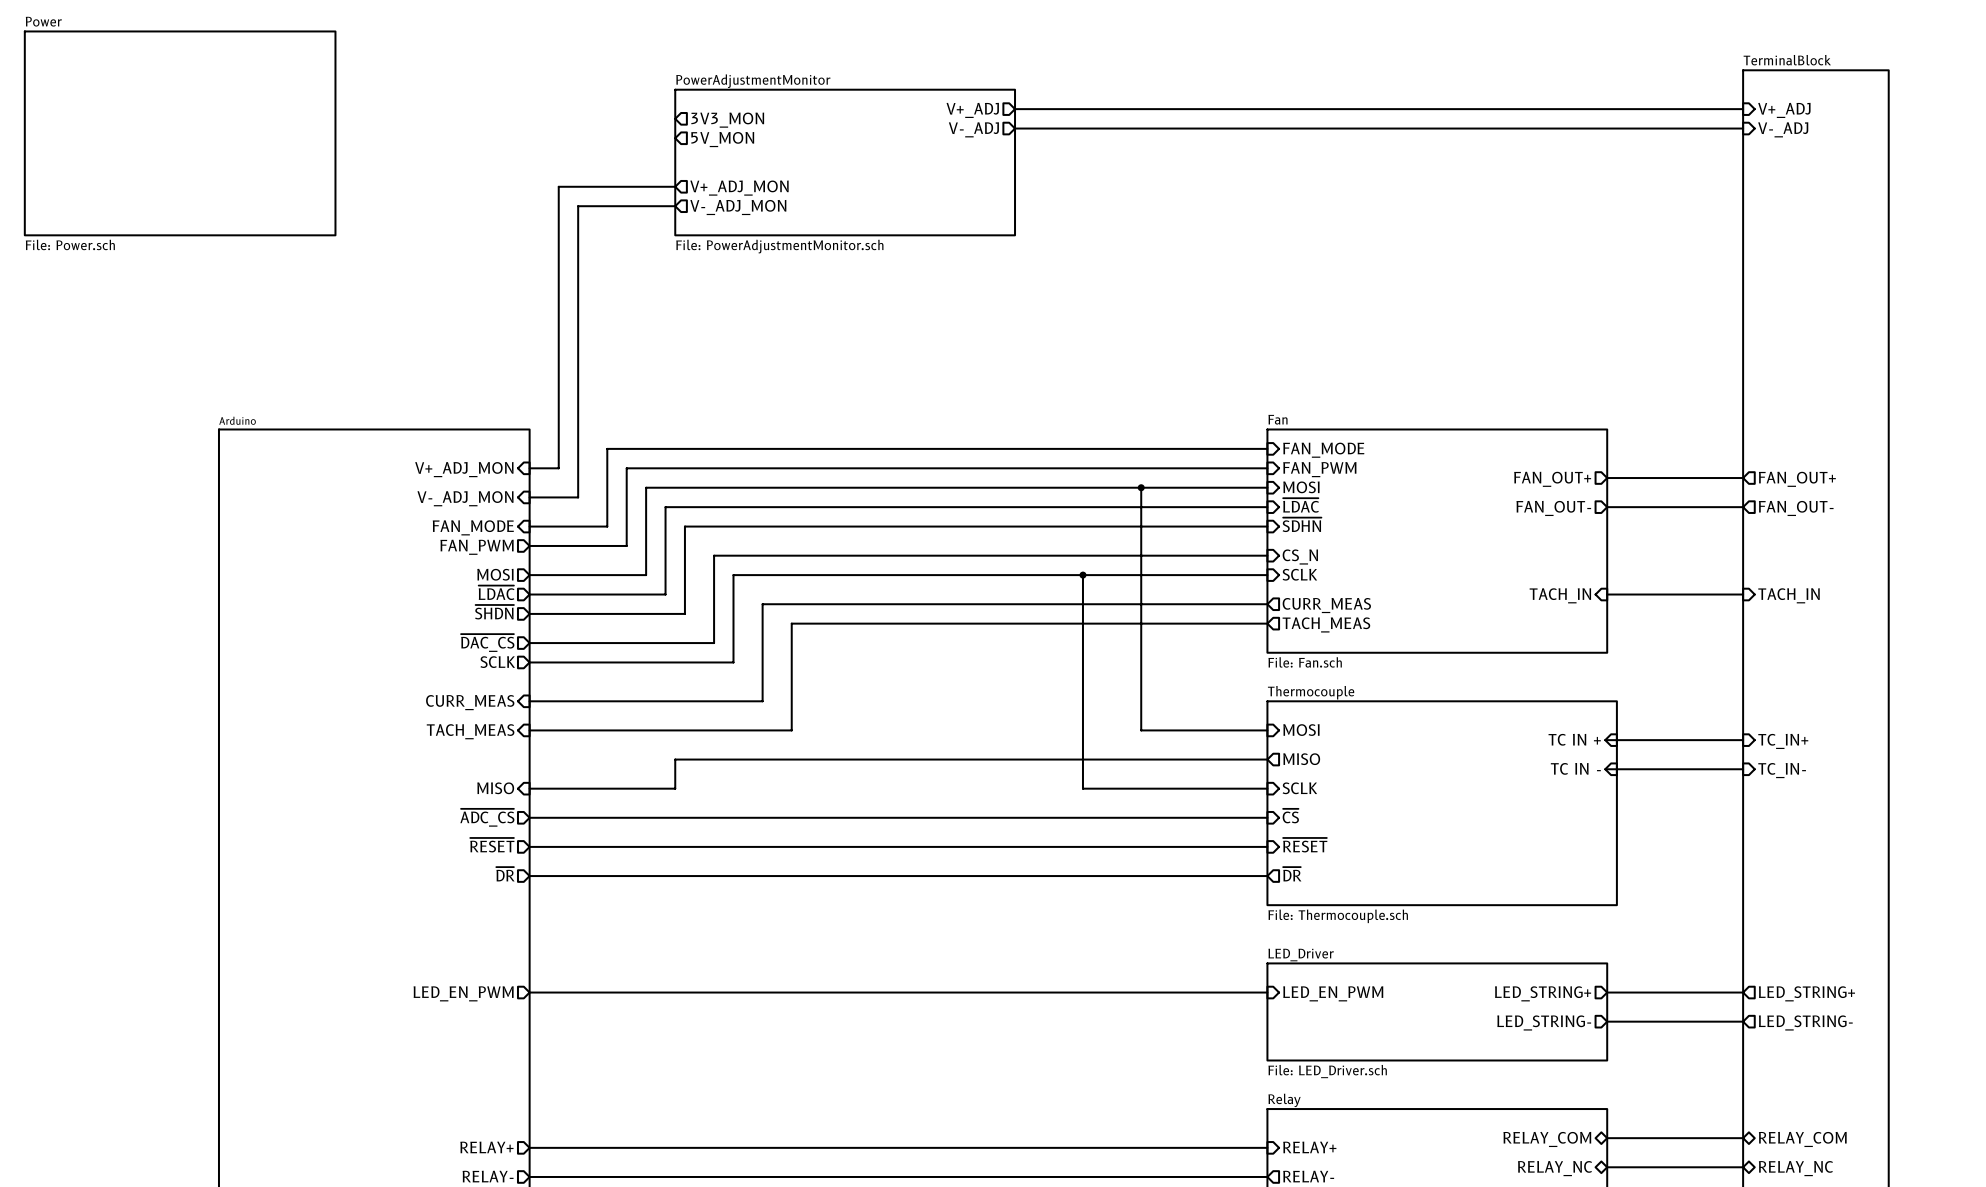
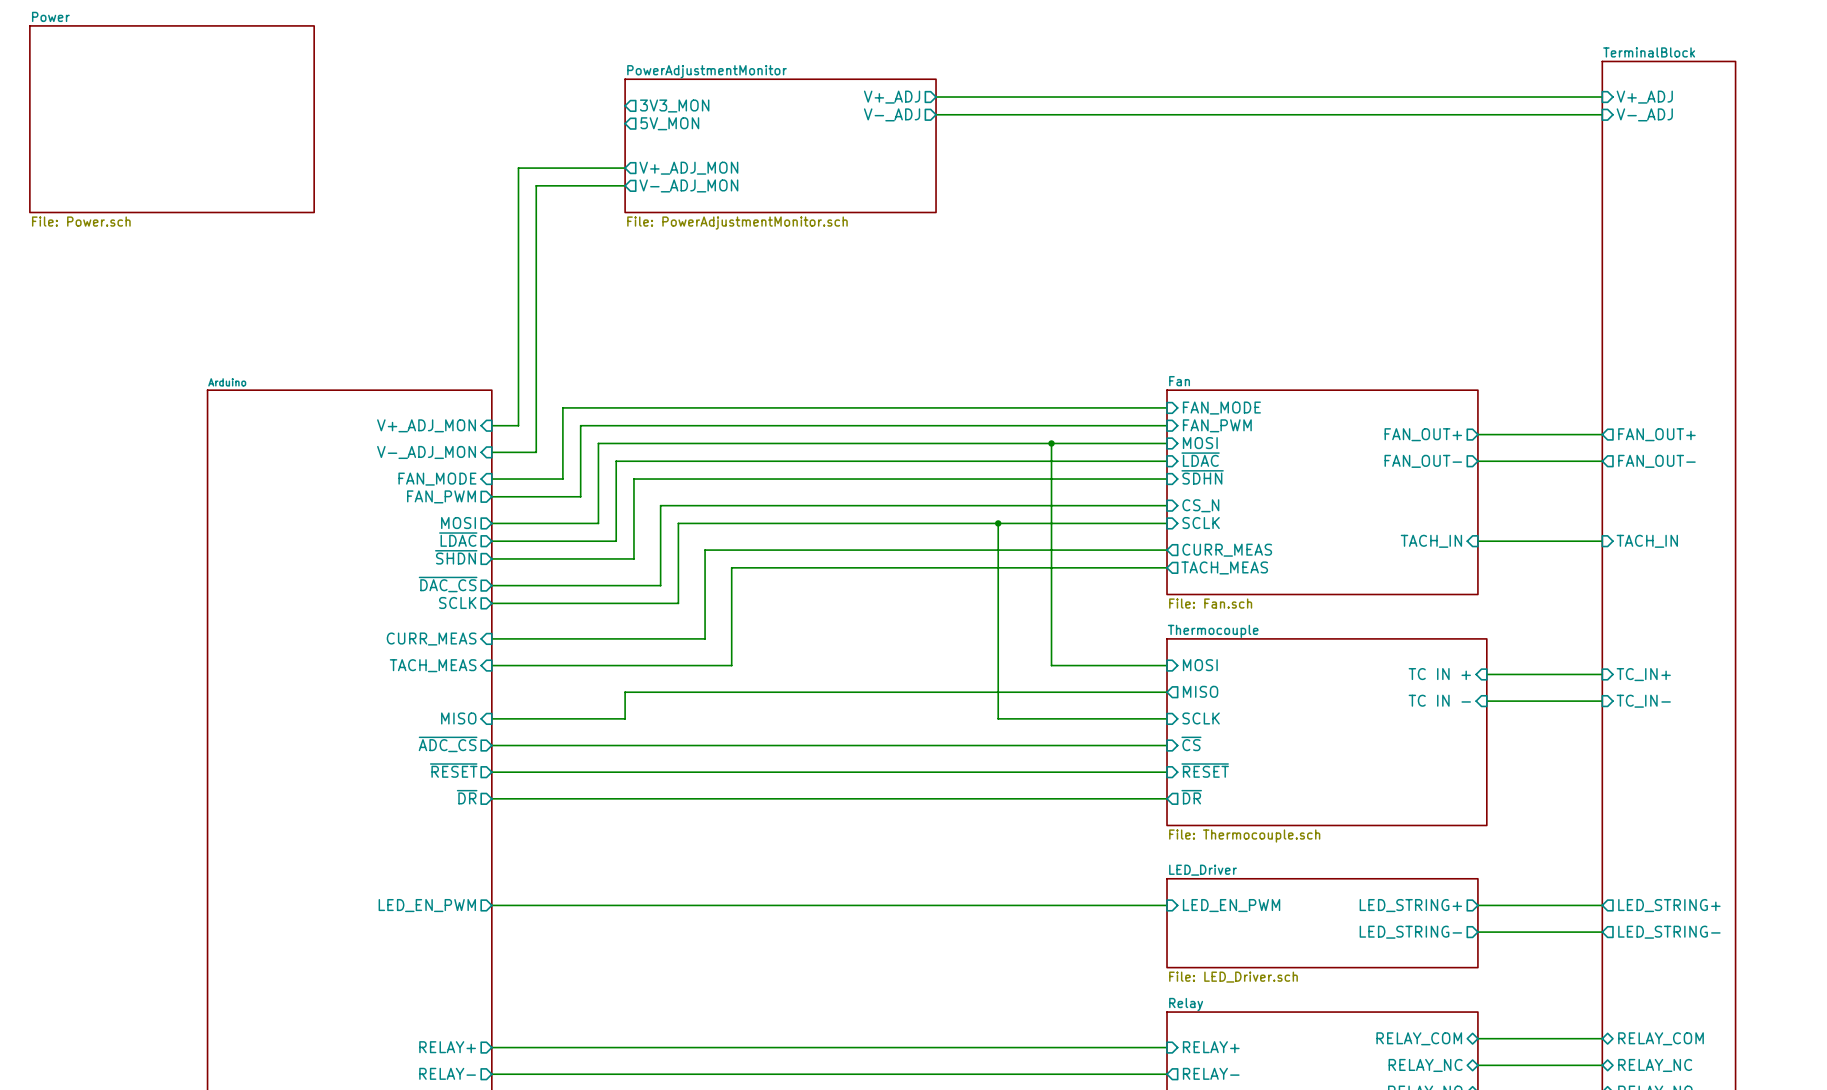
wire: (1607, 740) (1616, 740) -> none
wire: (1607, 769) (1616, 769) -> none

